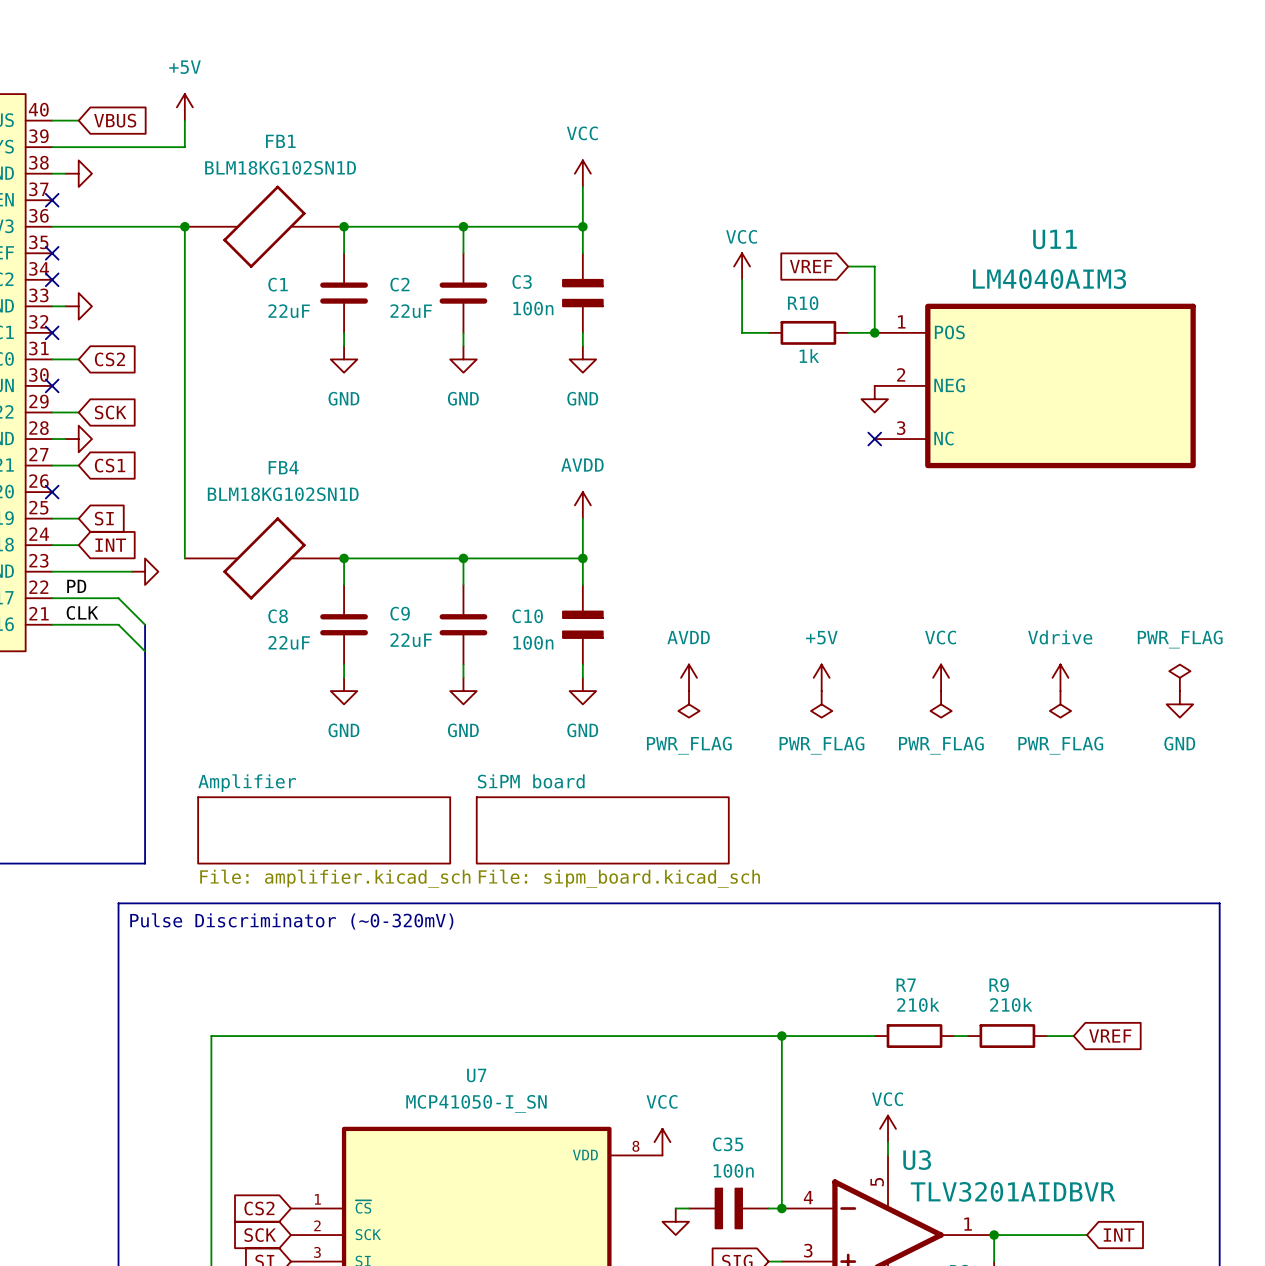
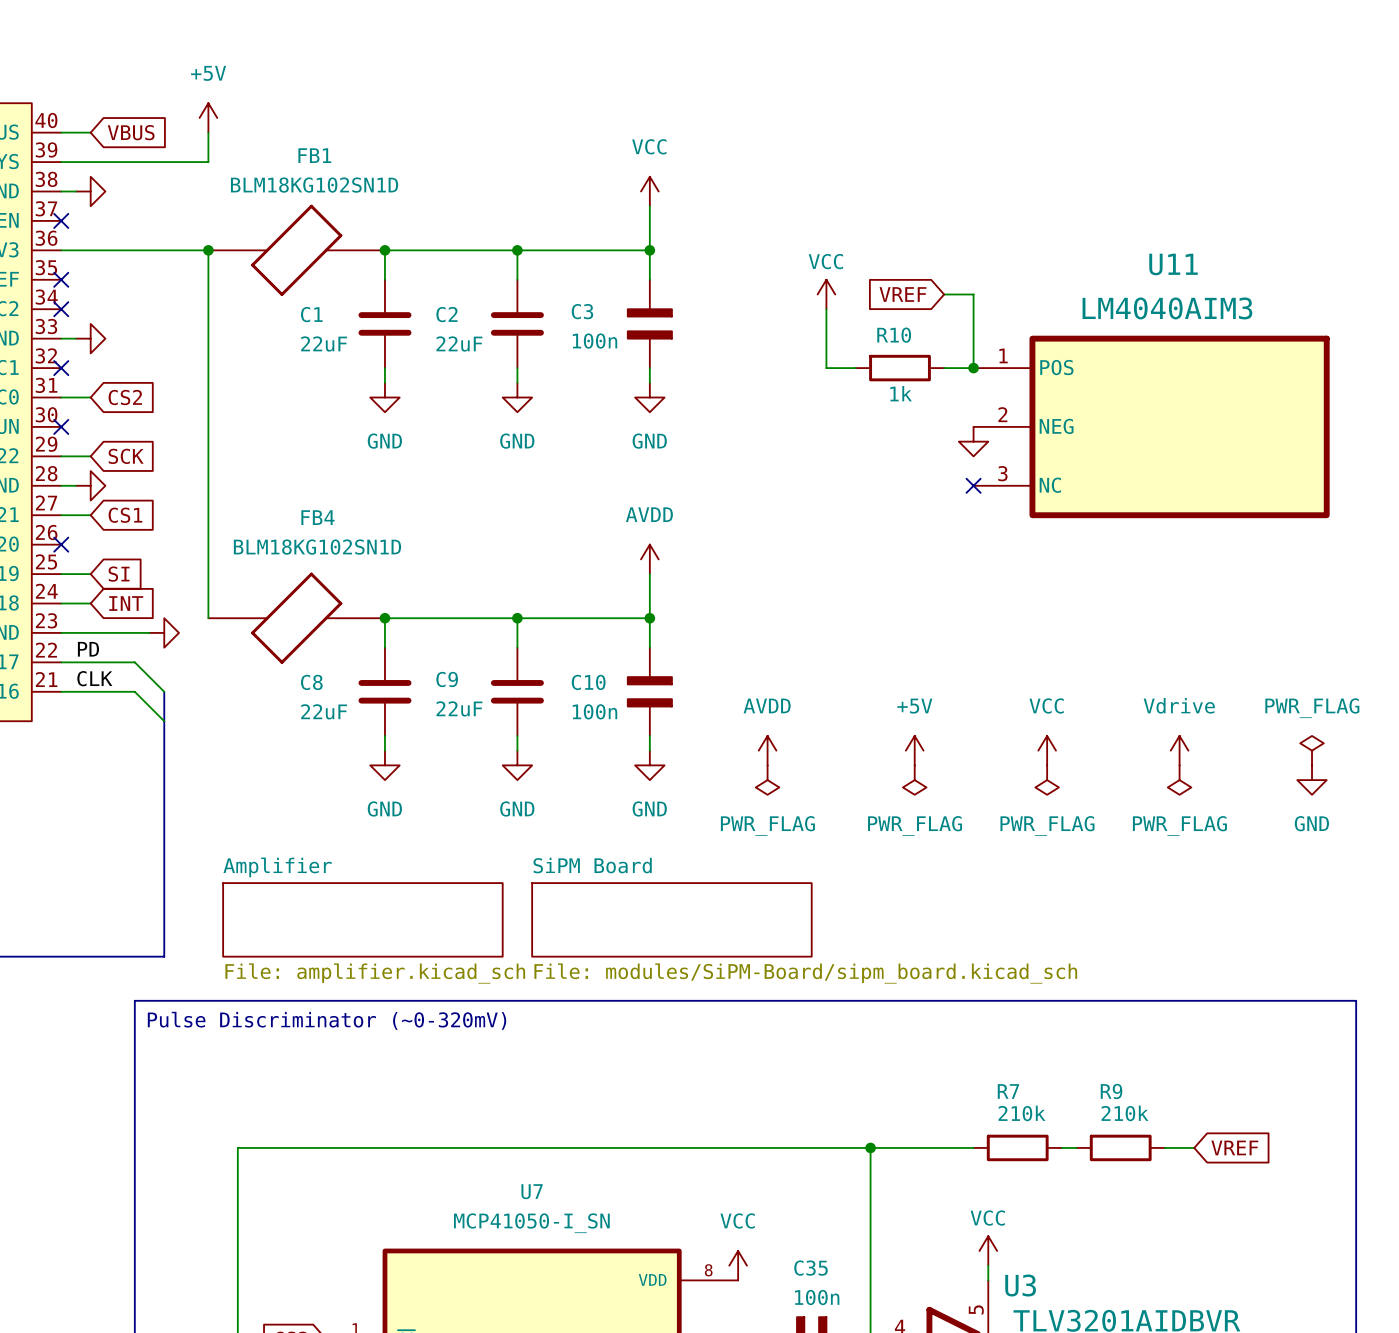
sheet SiPM board name: SiPM board (531, 781) -> SiPM Board (592, 865)
sheet SiPM board value: File: sipm_board.kicad_sch (619, 878) -> File: modules/SiPM-Board/sipm_board.kicad_sch (805, 973)

